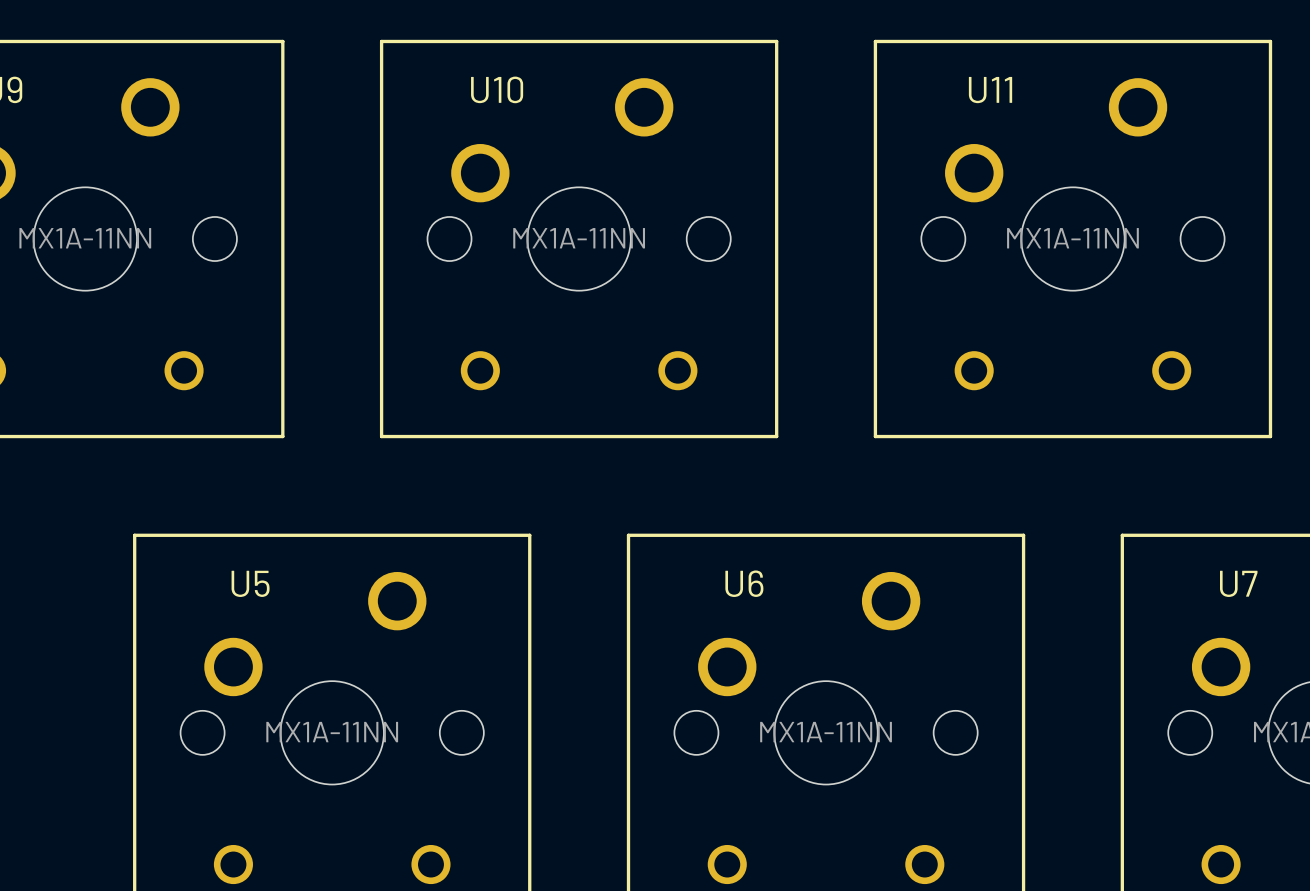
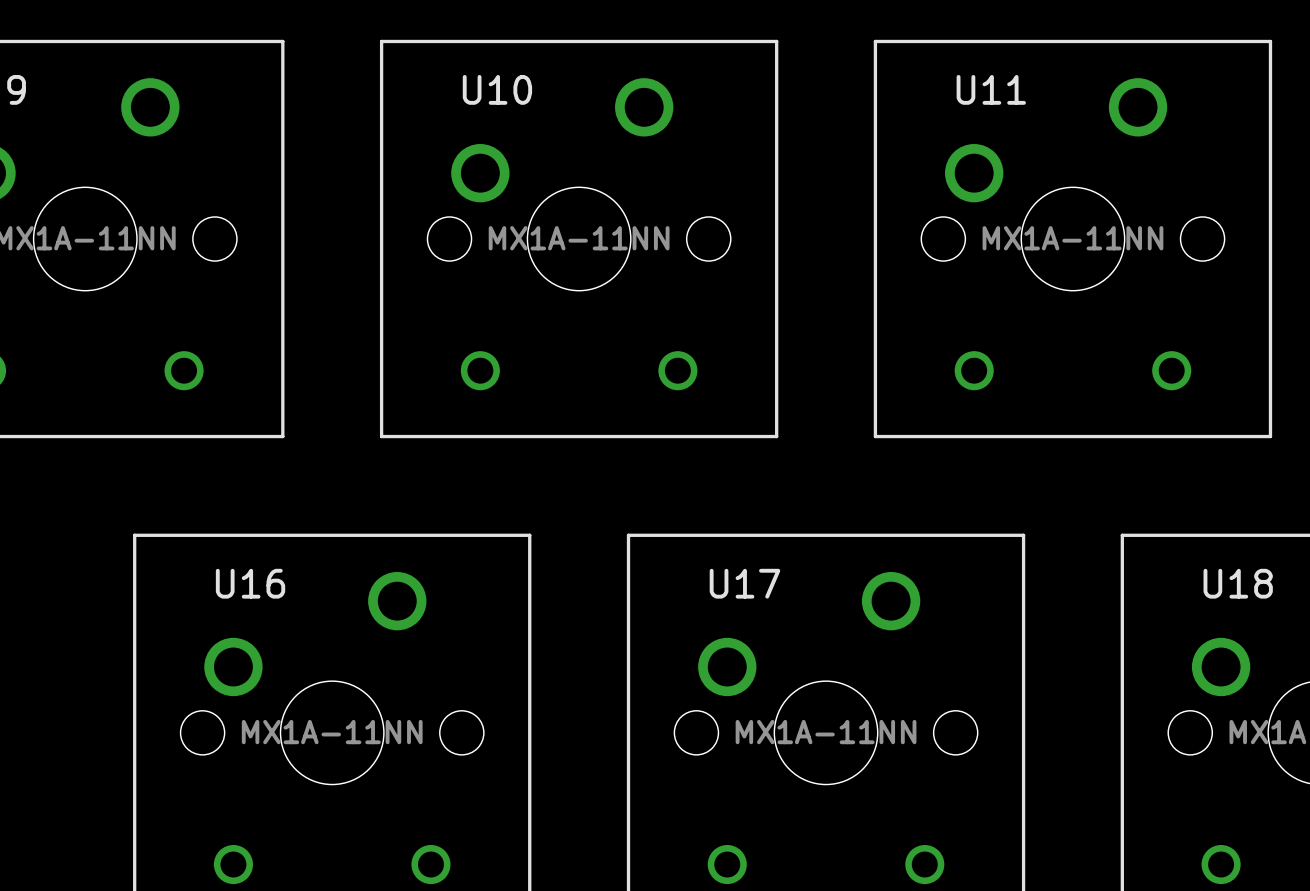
U5 name: U5 (250, 583) -> U16 (250, 583)
U6 name: U6 (744, 583) -> U17 (744, 583)
U7 name: U7 (1238, 583) -> U18 (1238, 583)

